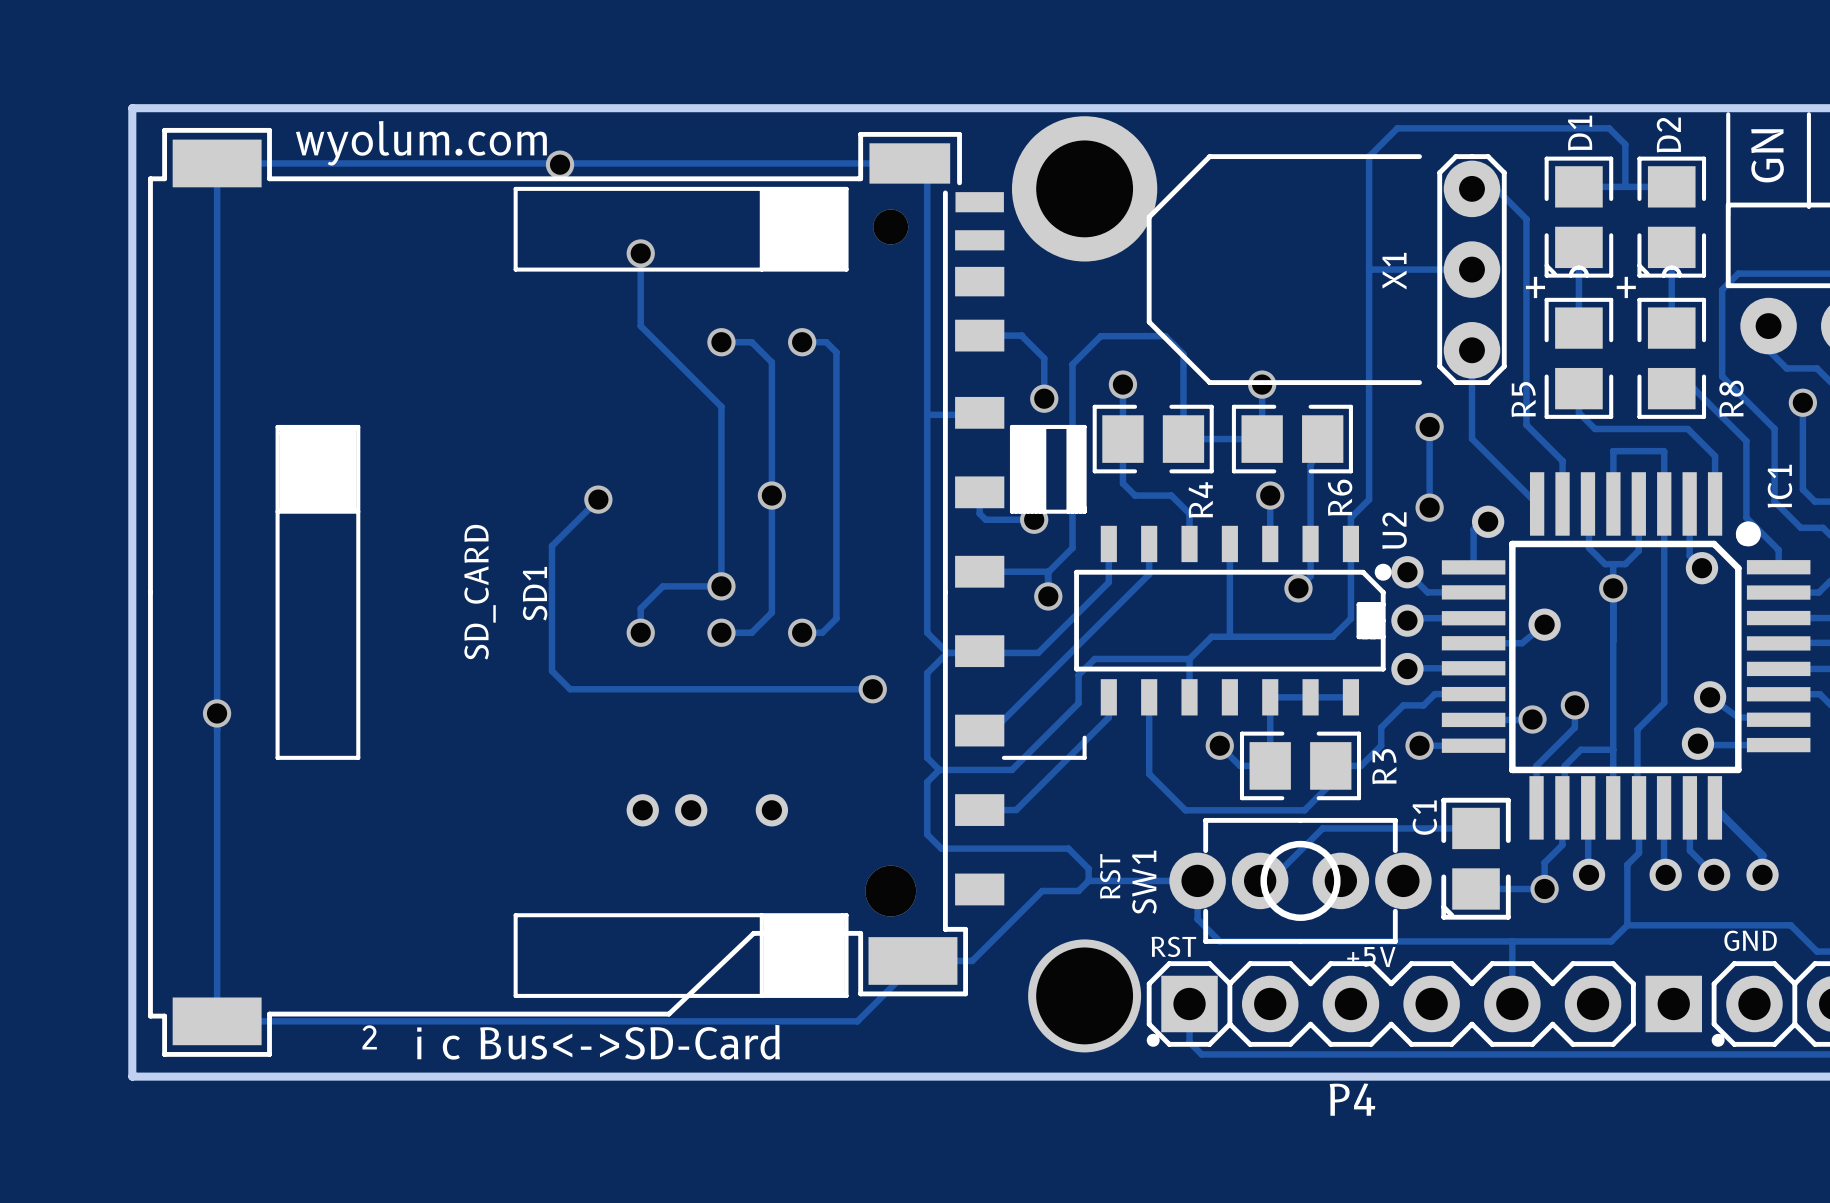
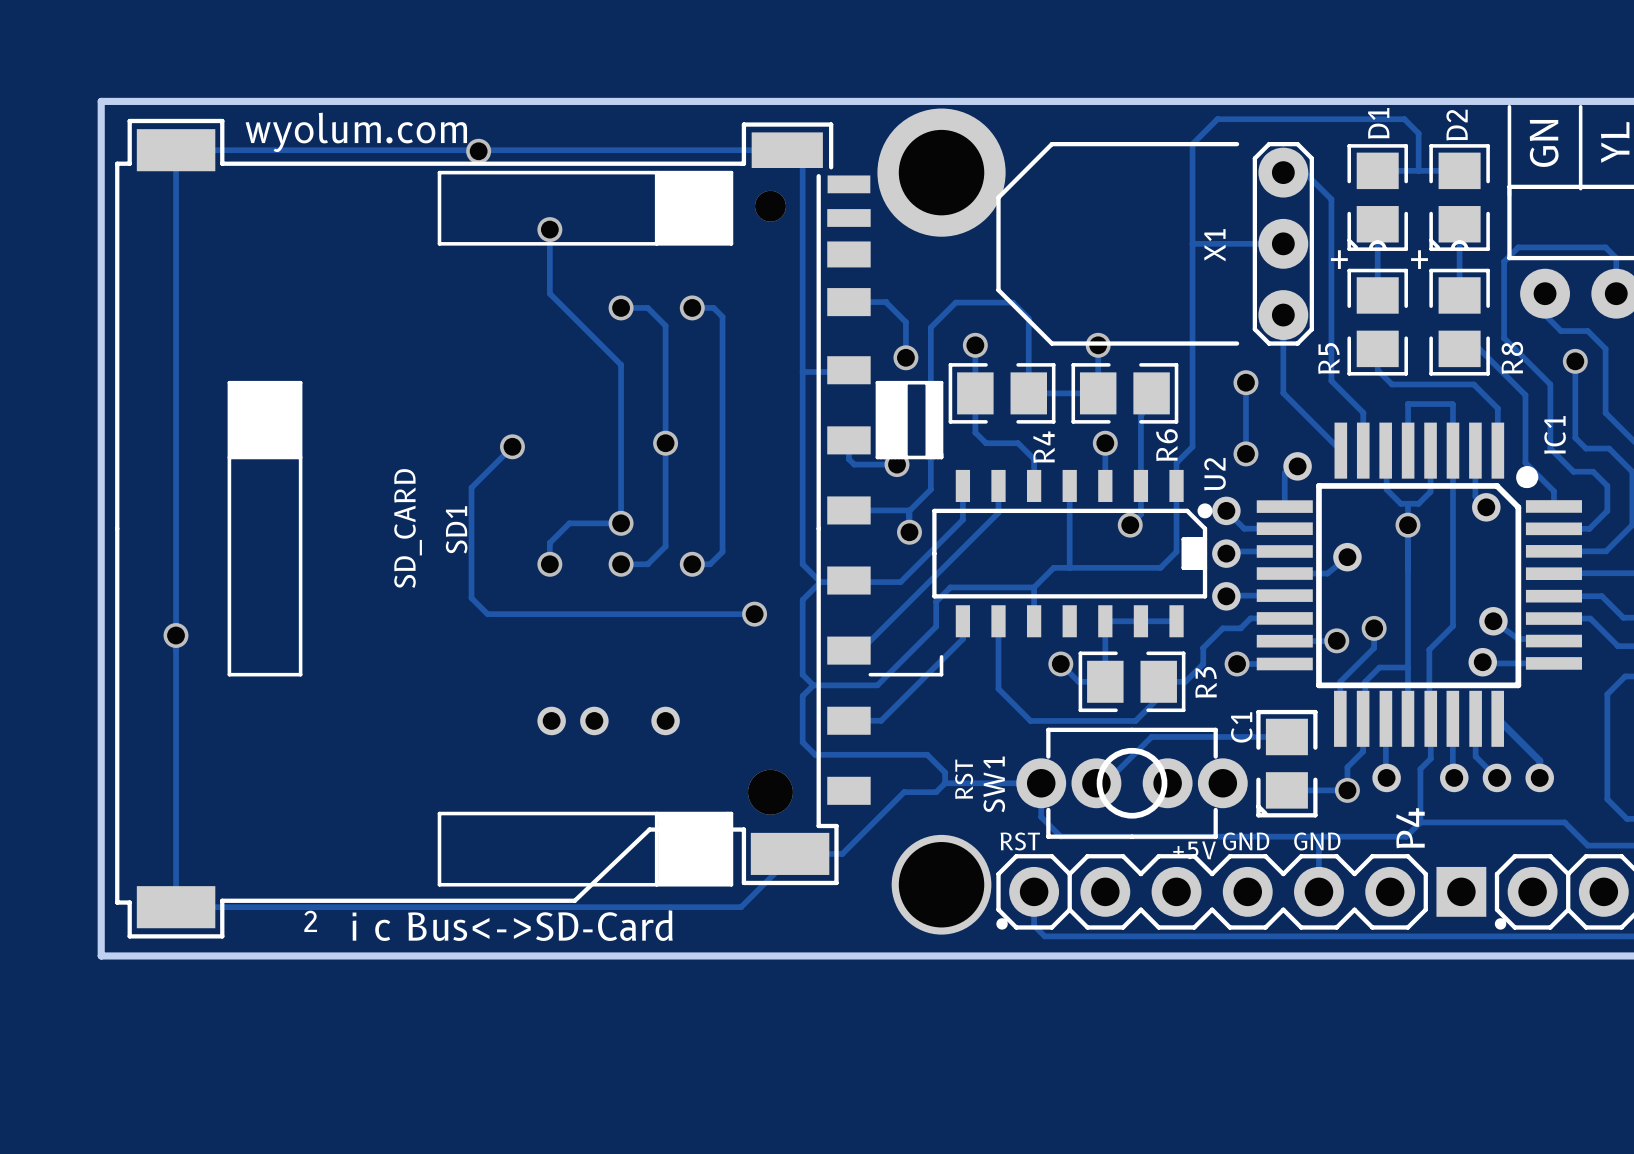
text: GND (1750, 940) -> none
text: none -> GND (1246, 841)
text: none -> GND (1317, 841)
P4 footprint: [1146, 961, 1636, 1047] -> [996, 854, 1428, 930]
P4 name rotation: 0° (1352, 1099) -> 90° counterclockwise (1410, 828)
P4 name position: P4 (1352, 1099) -> P4 (1410, 828)

